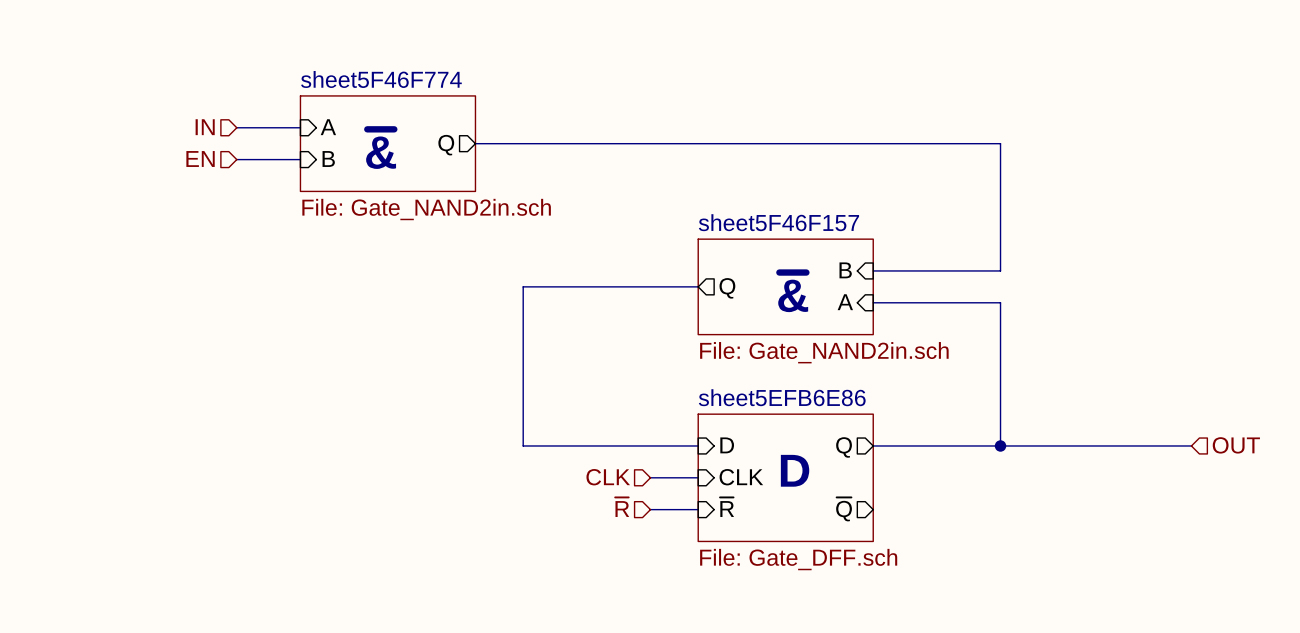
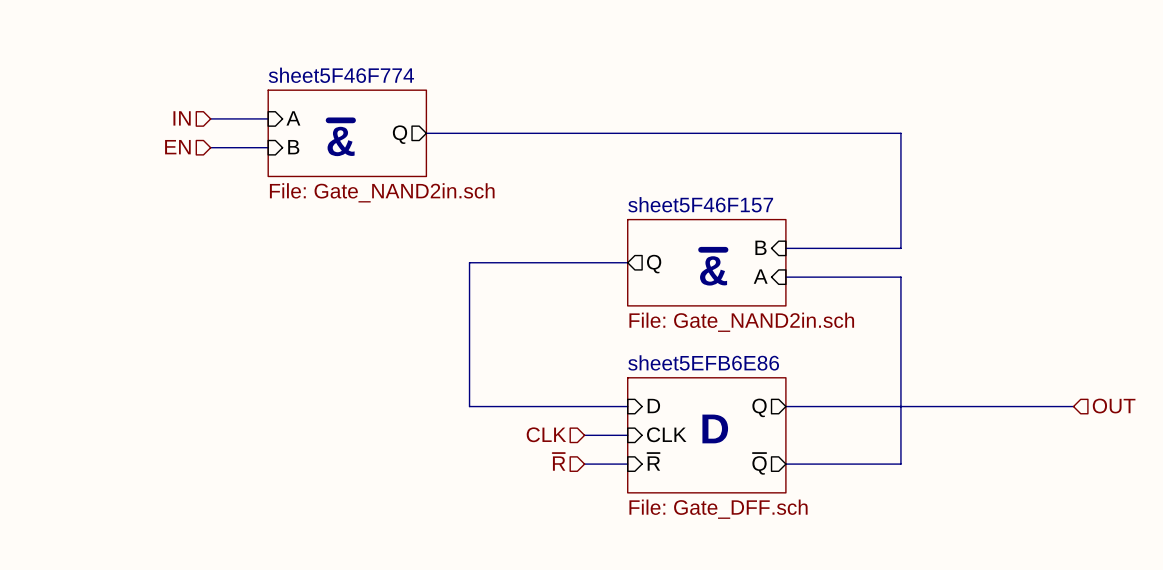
wire: none -> (900, 406) (900, 464) (785, 464)
junction: (1000, 445) -> none

